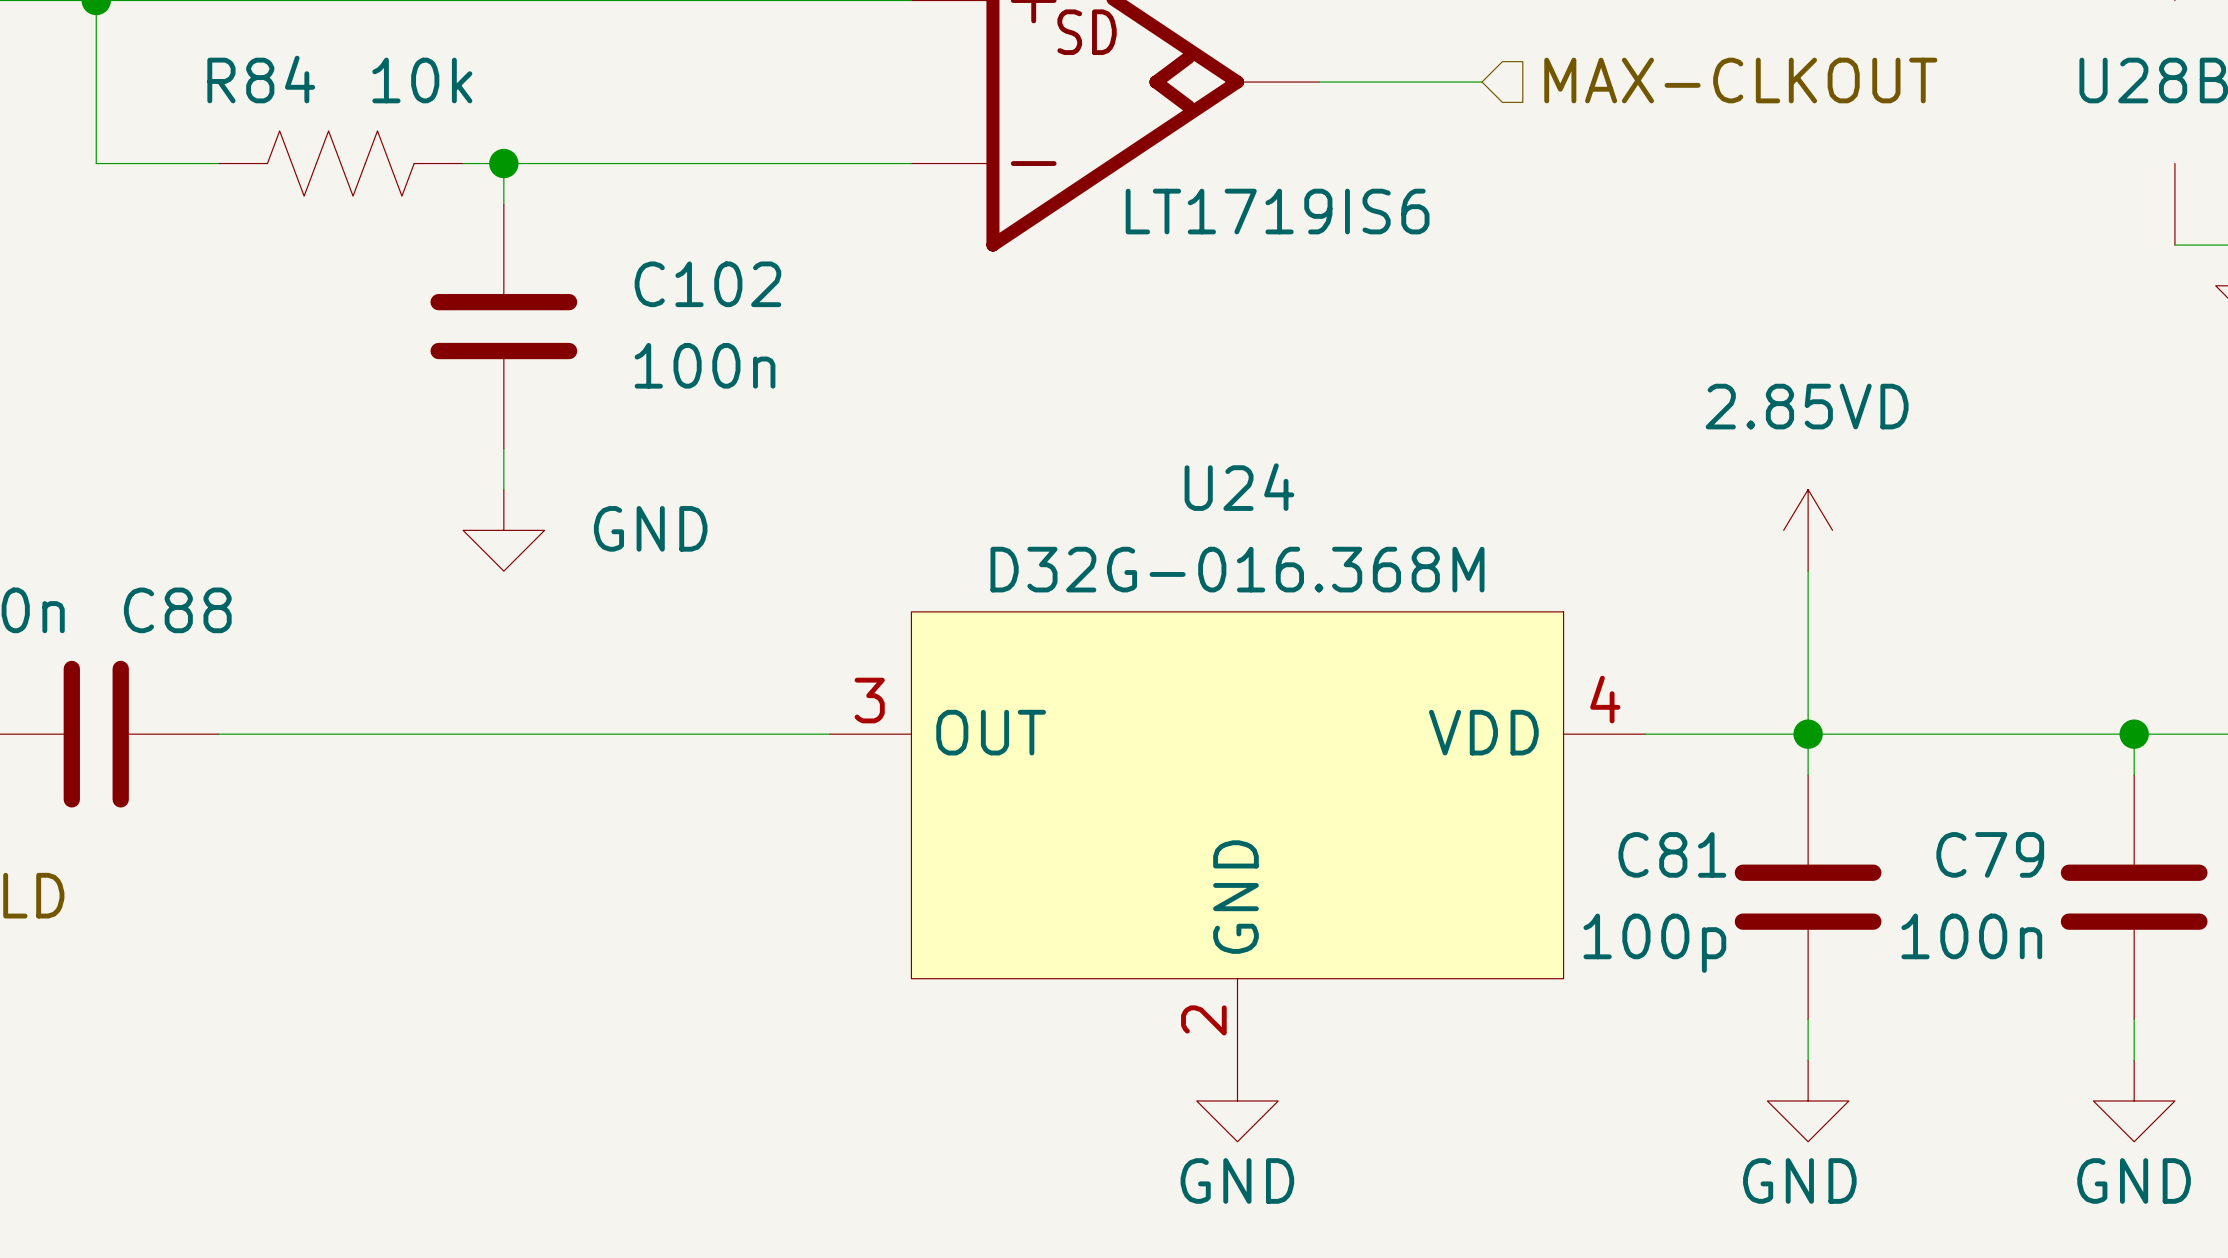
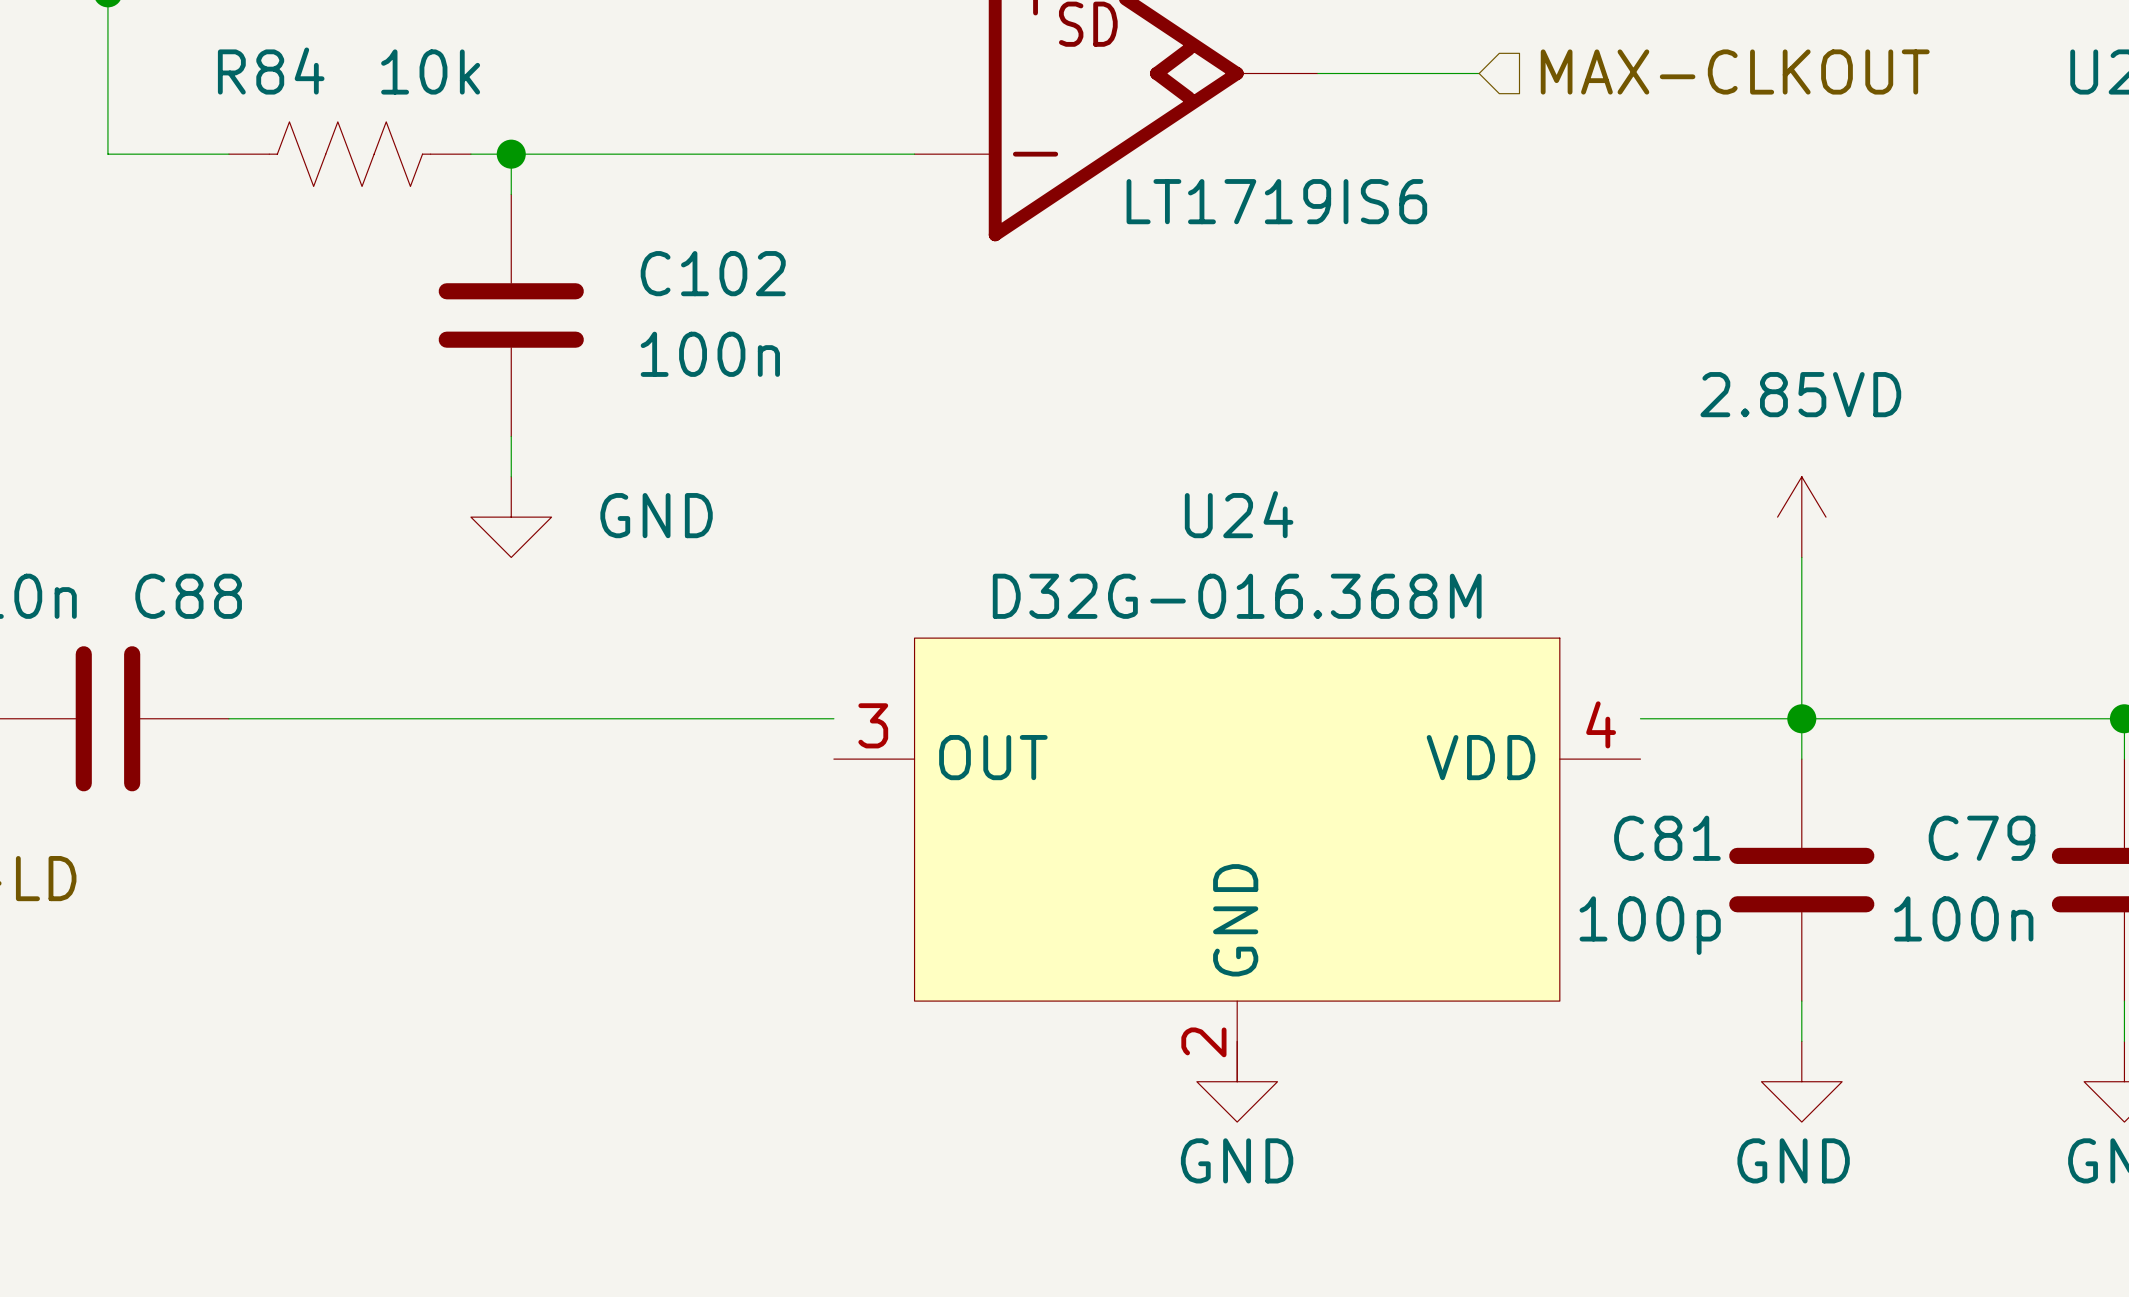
U24 position: (1237, 836) -> (1237, 859)

